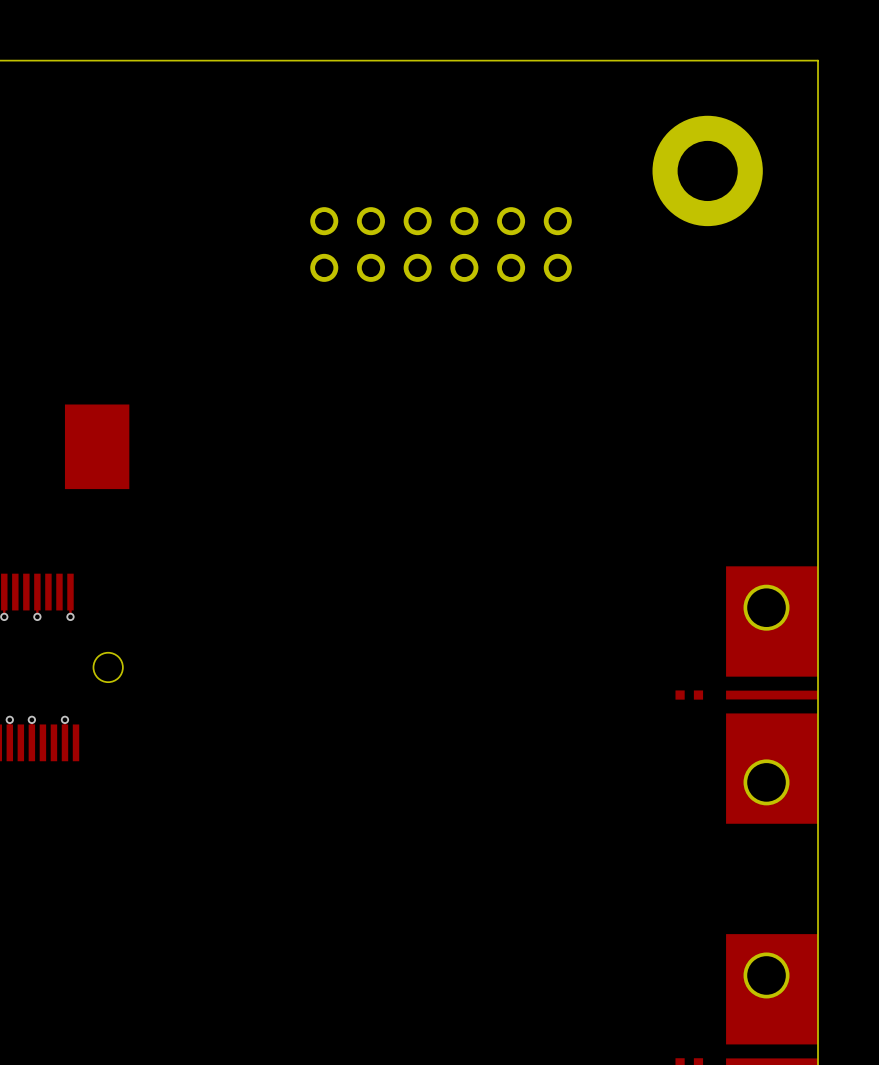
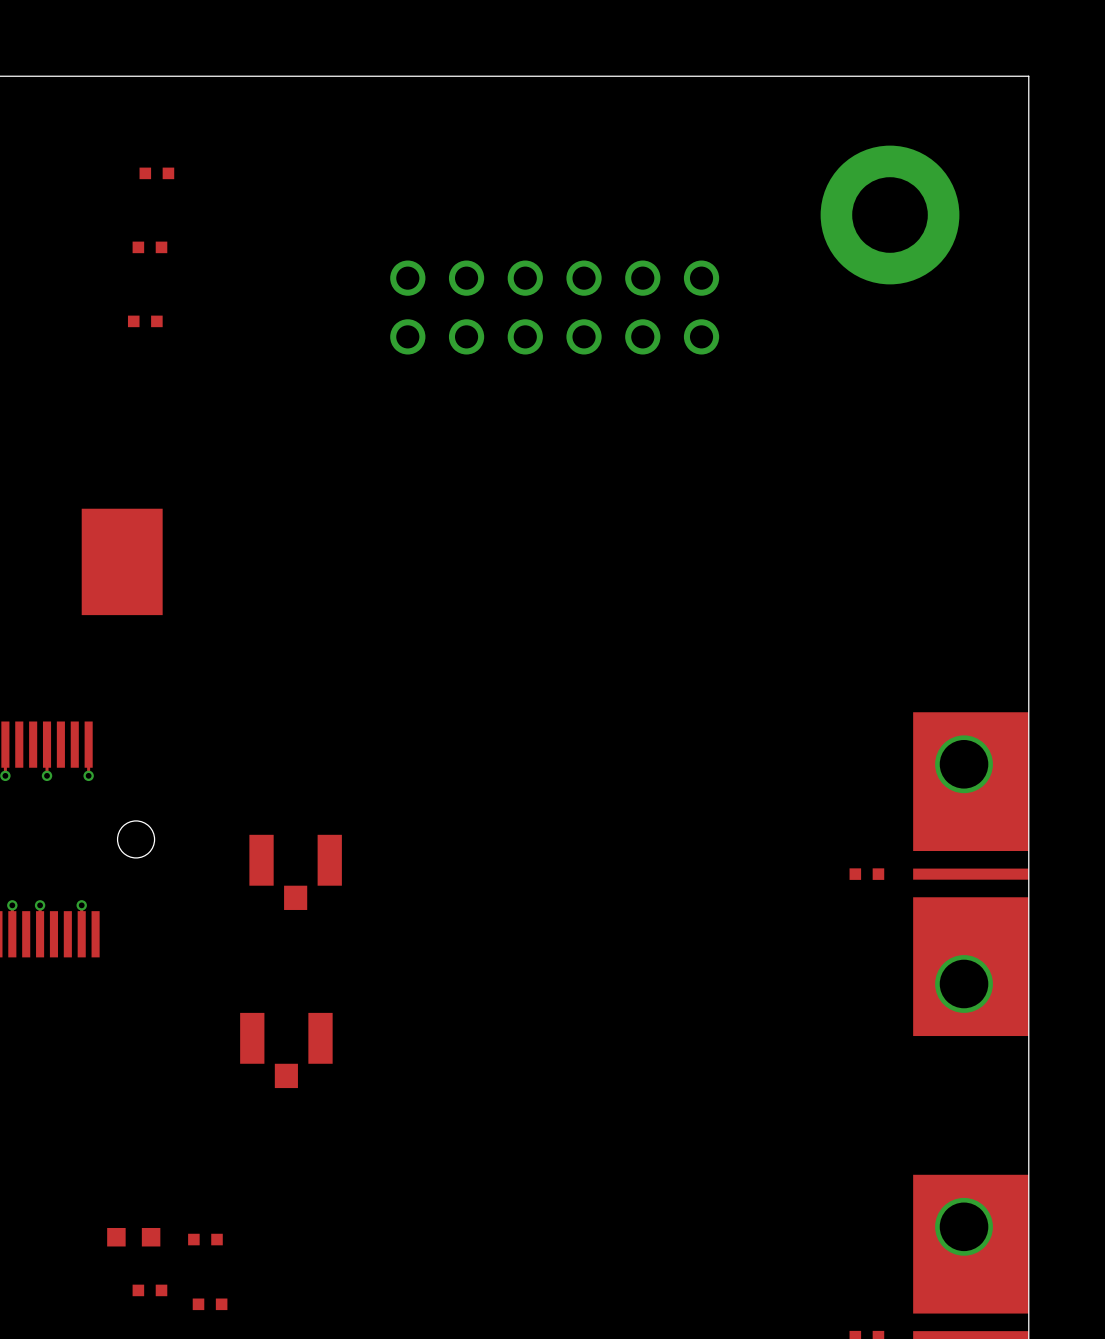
part: none -> (156, 173)
part: none -> (149, 247)
part: none -> (145, 321)
part: none -> (295, 872)
part: none -> (286, 1050)
part: none -> (133, 1237)
part: none -> (205, 1239)
part: none -> (149, 1290)
part: none -> (210, 1304)

